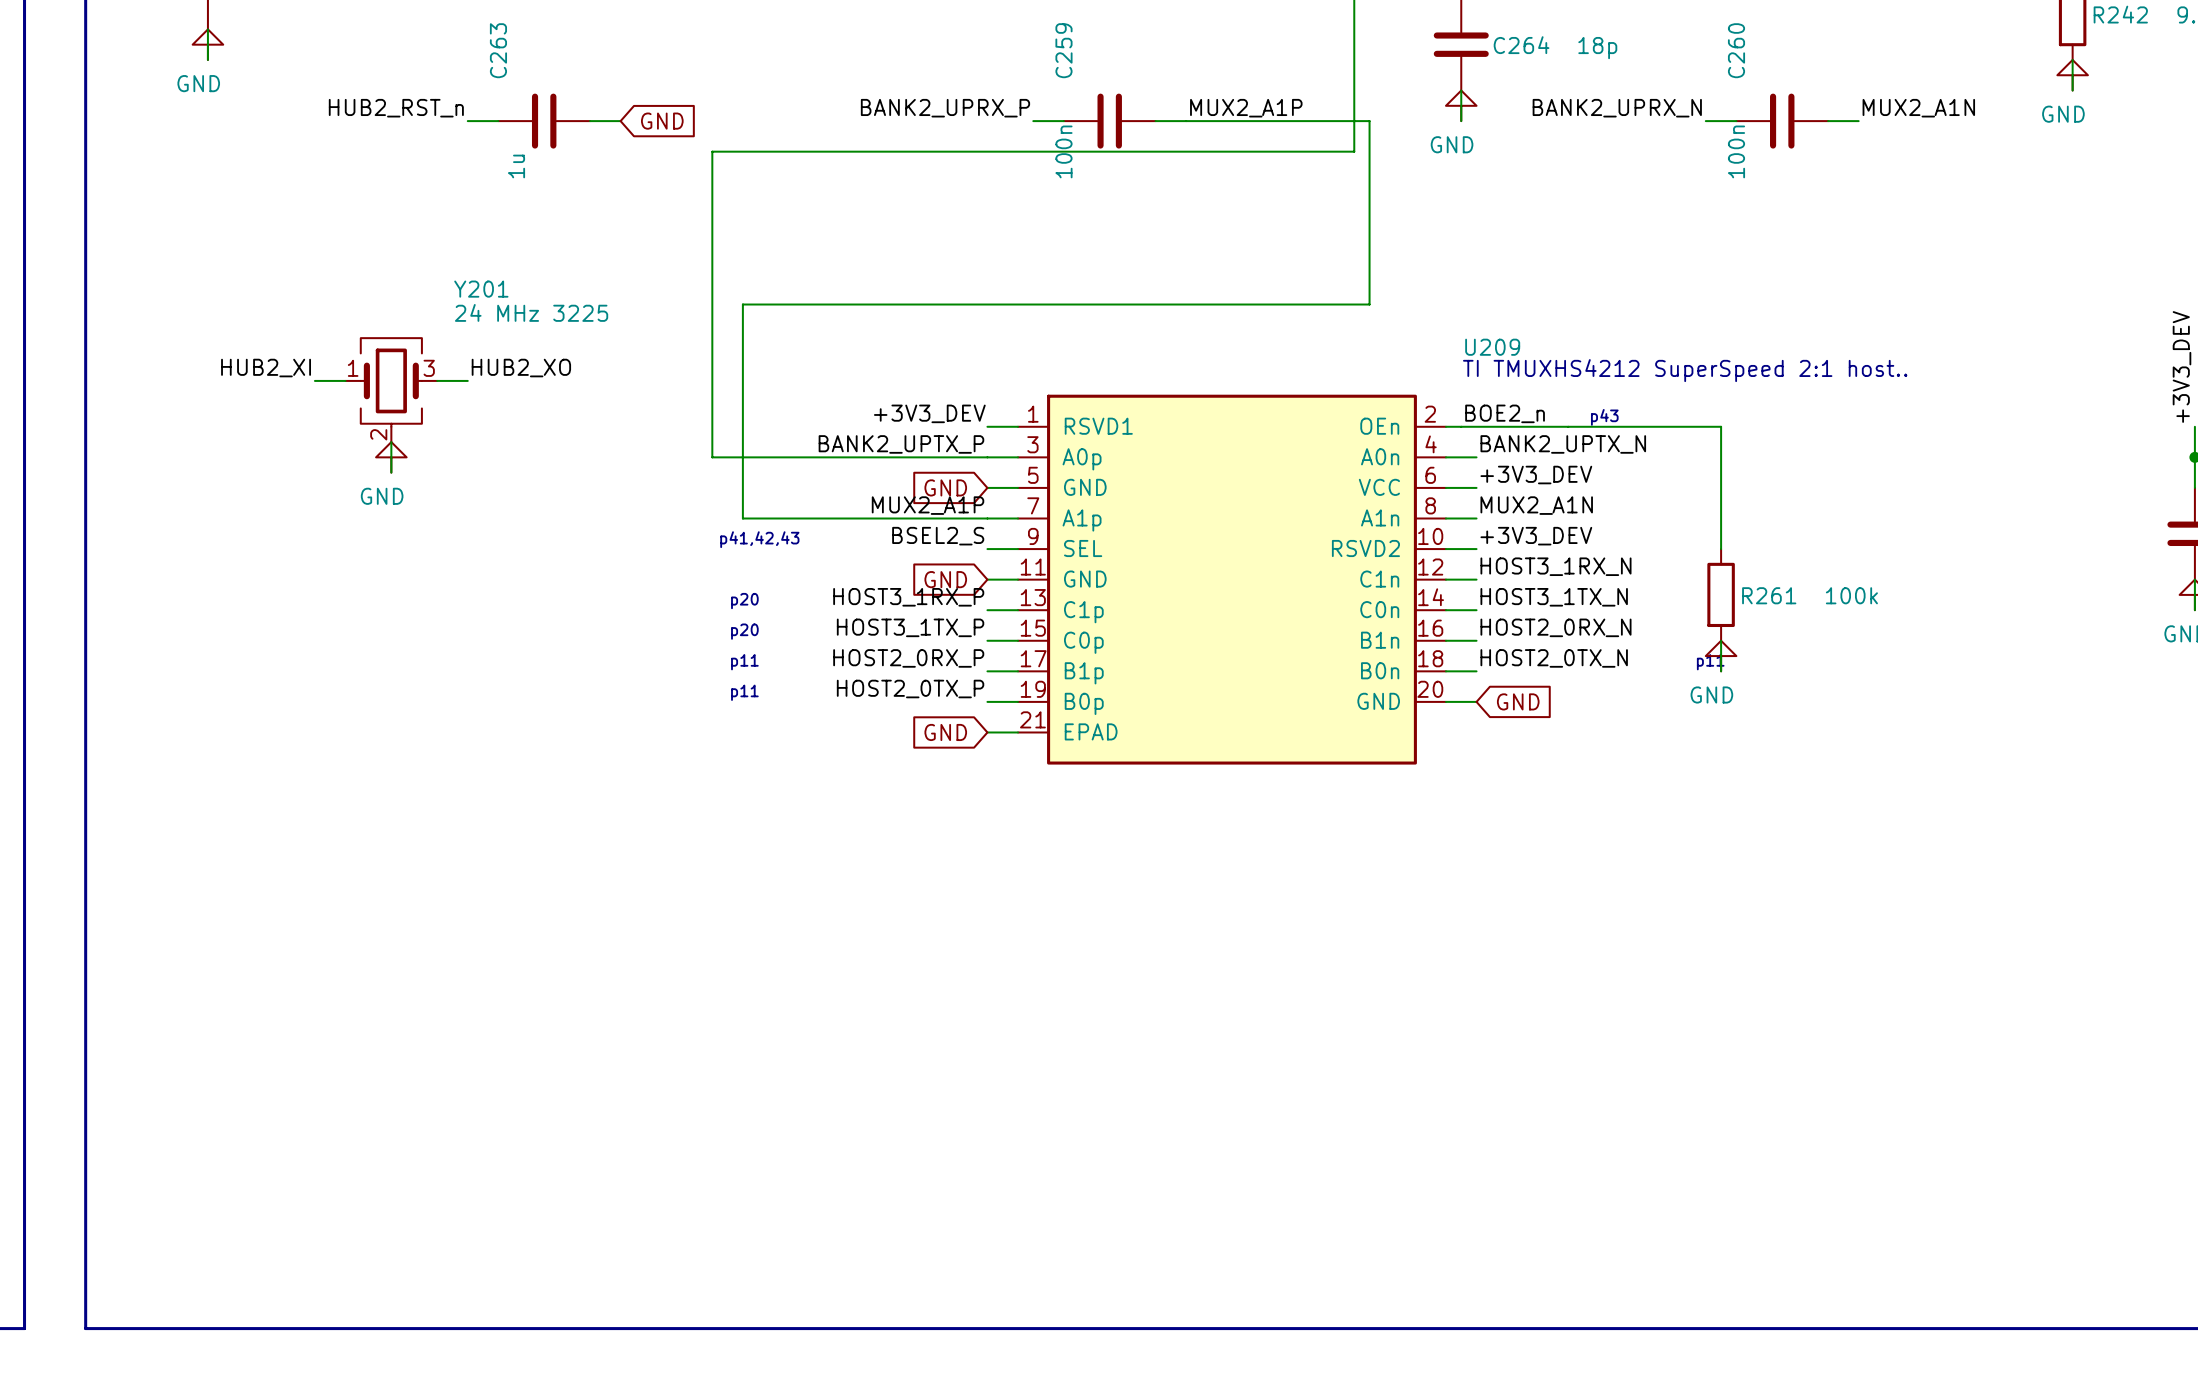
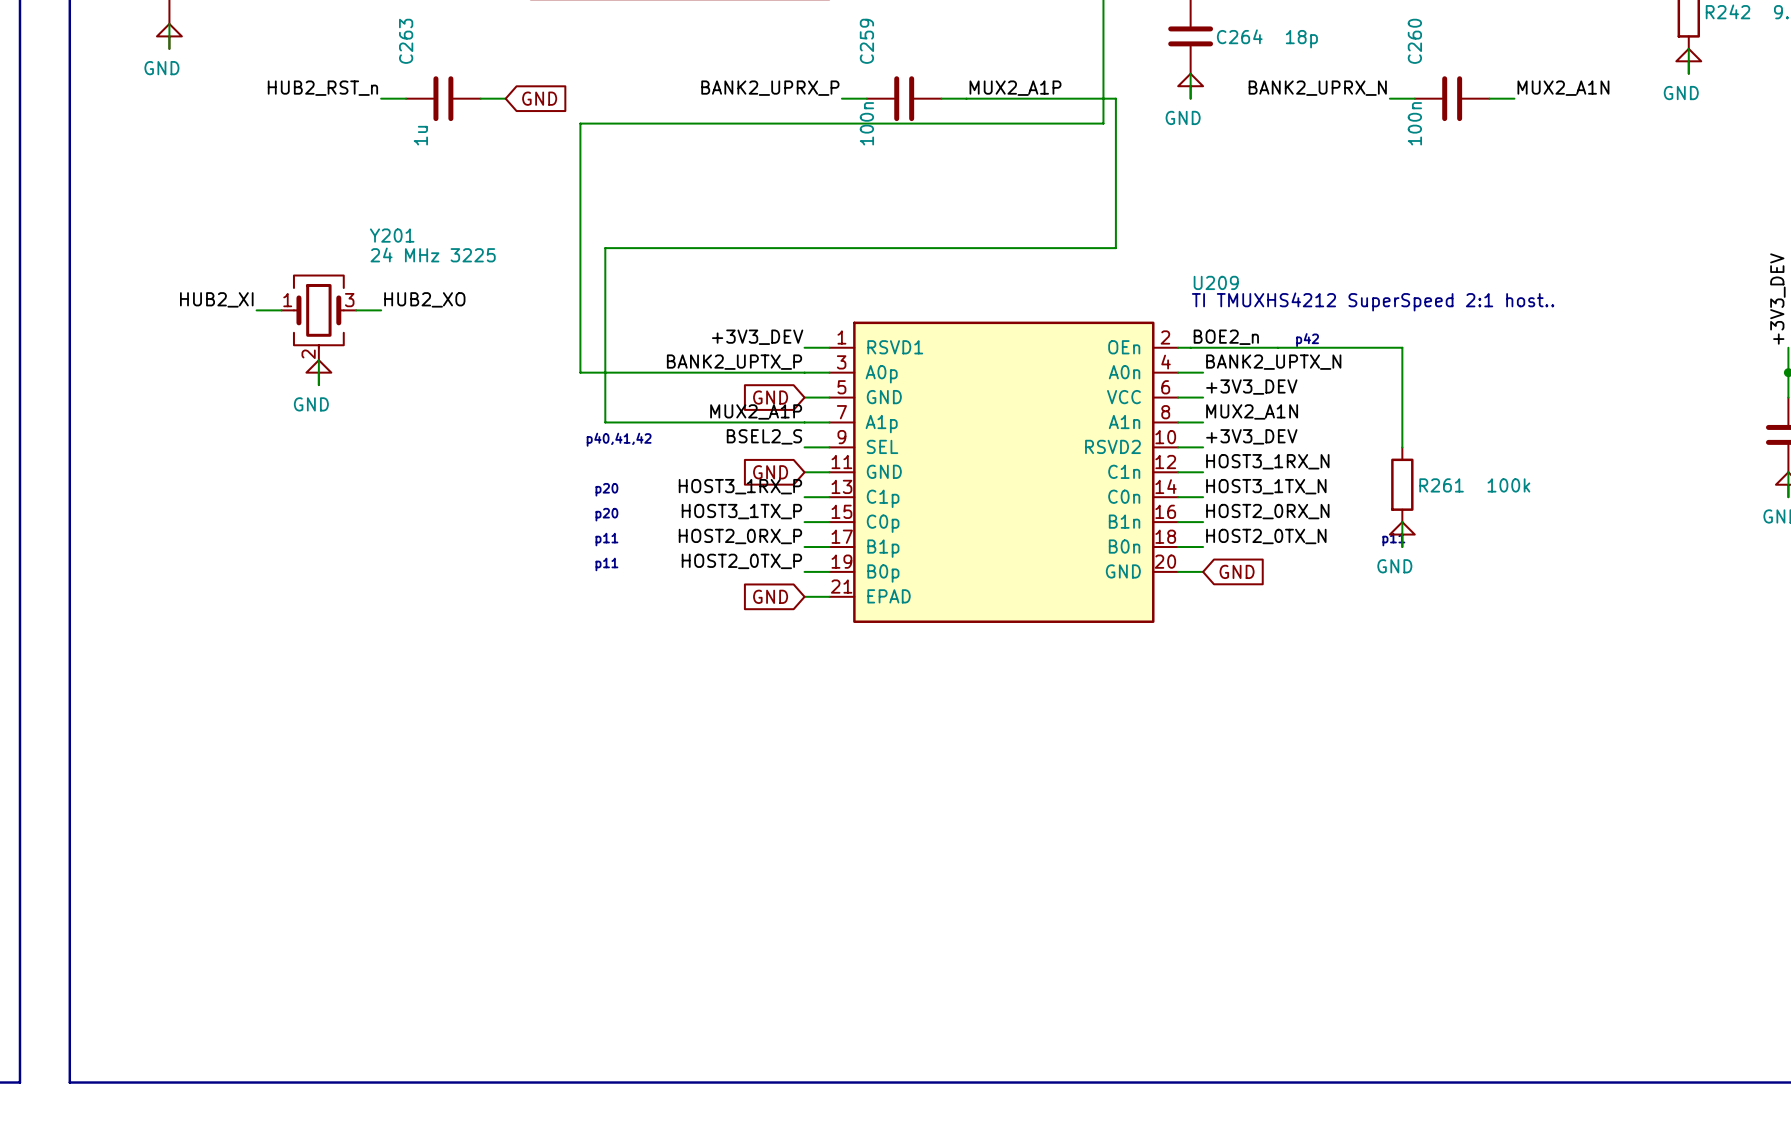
text: p43 (1604, 417) -> p42 (1307, 340)
text: p41,42,43 (759, 539) -> p40,41,42 (619, 439)

